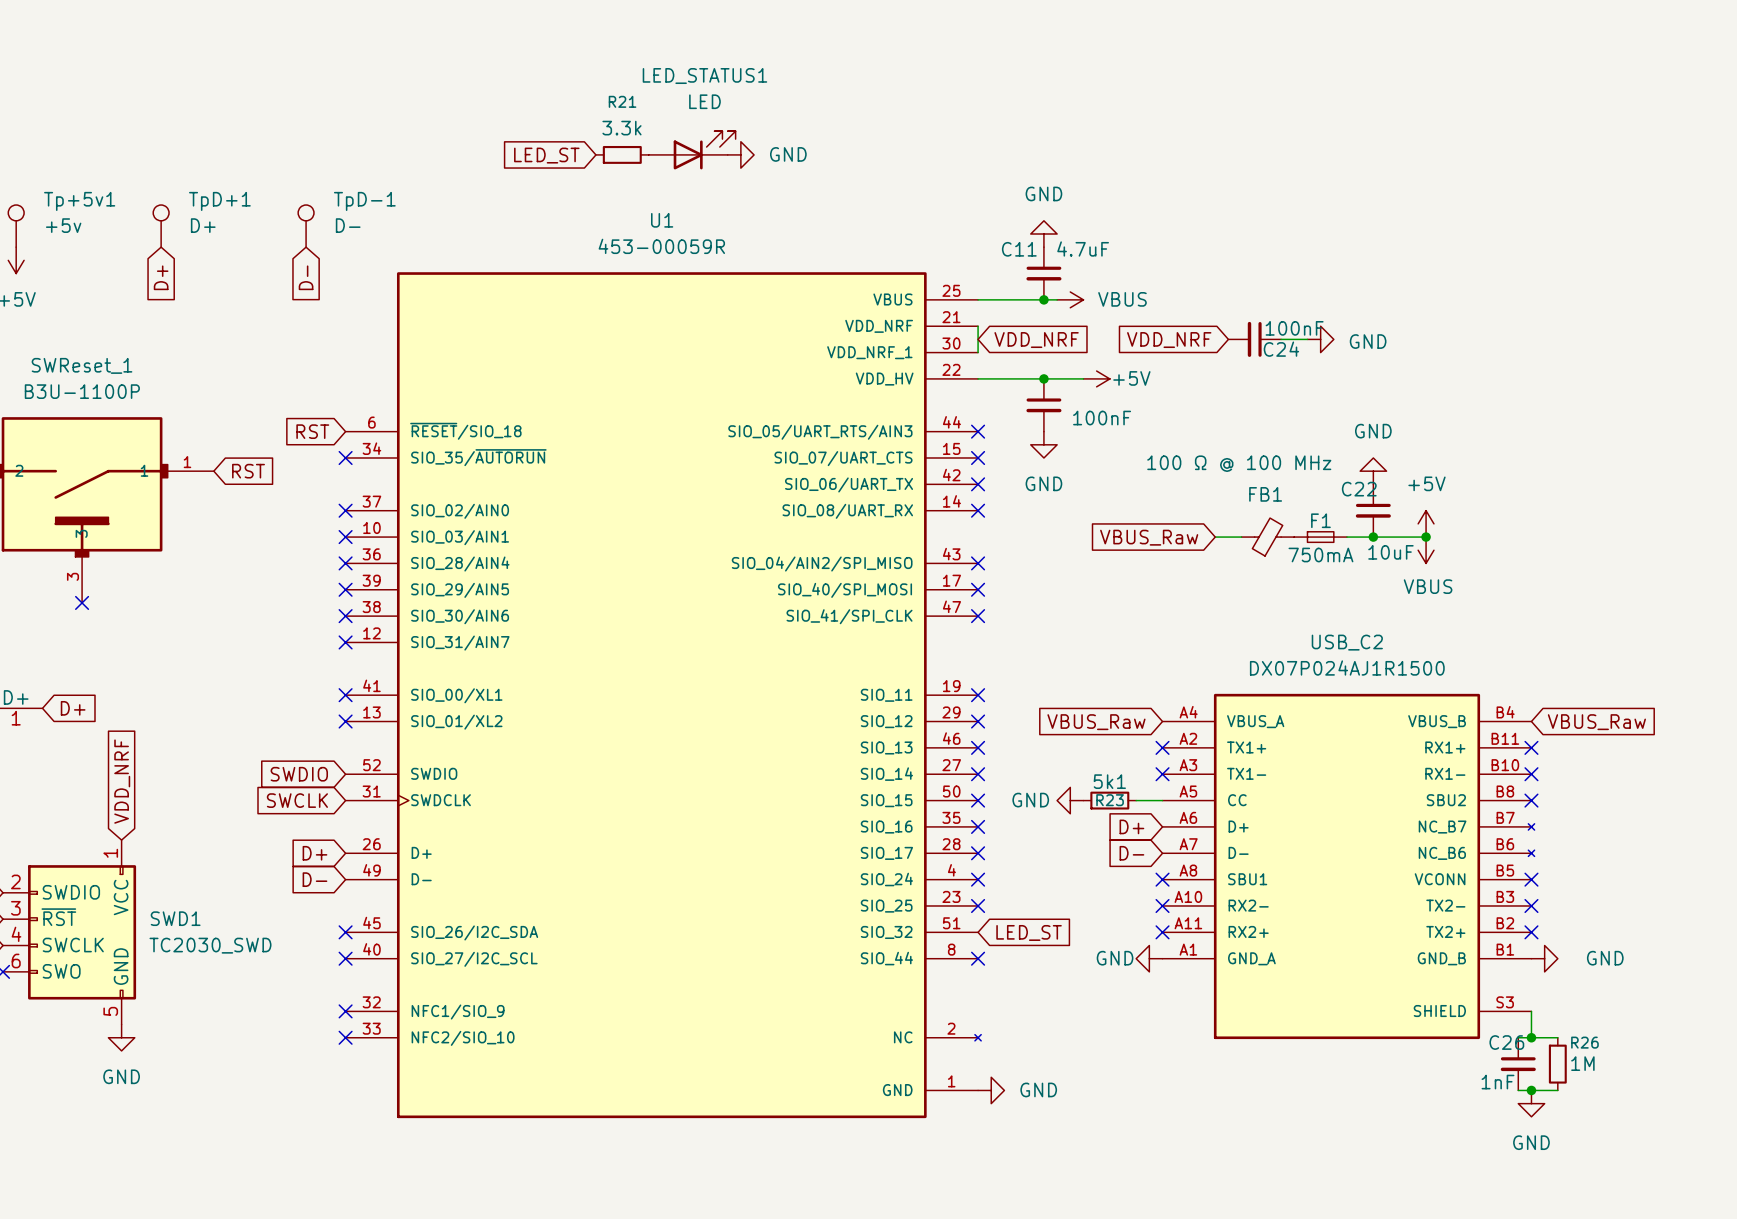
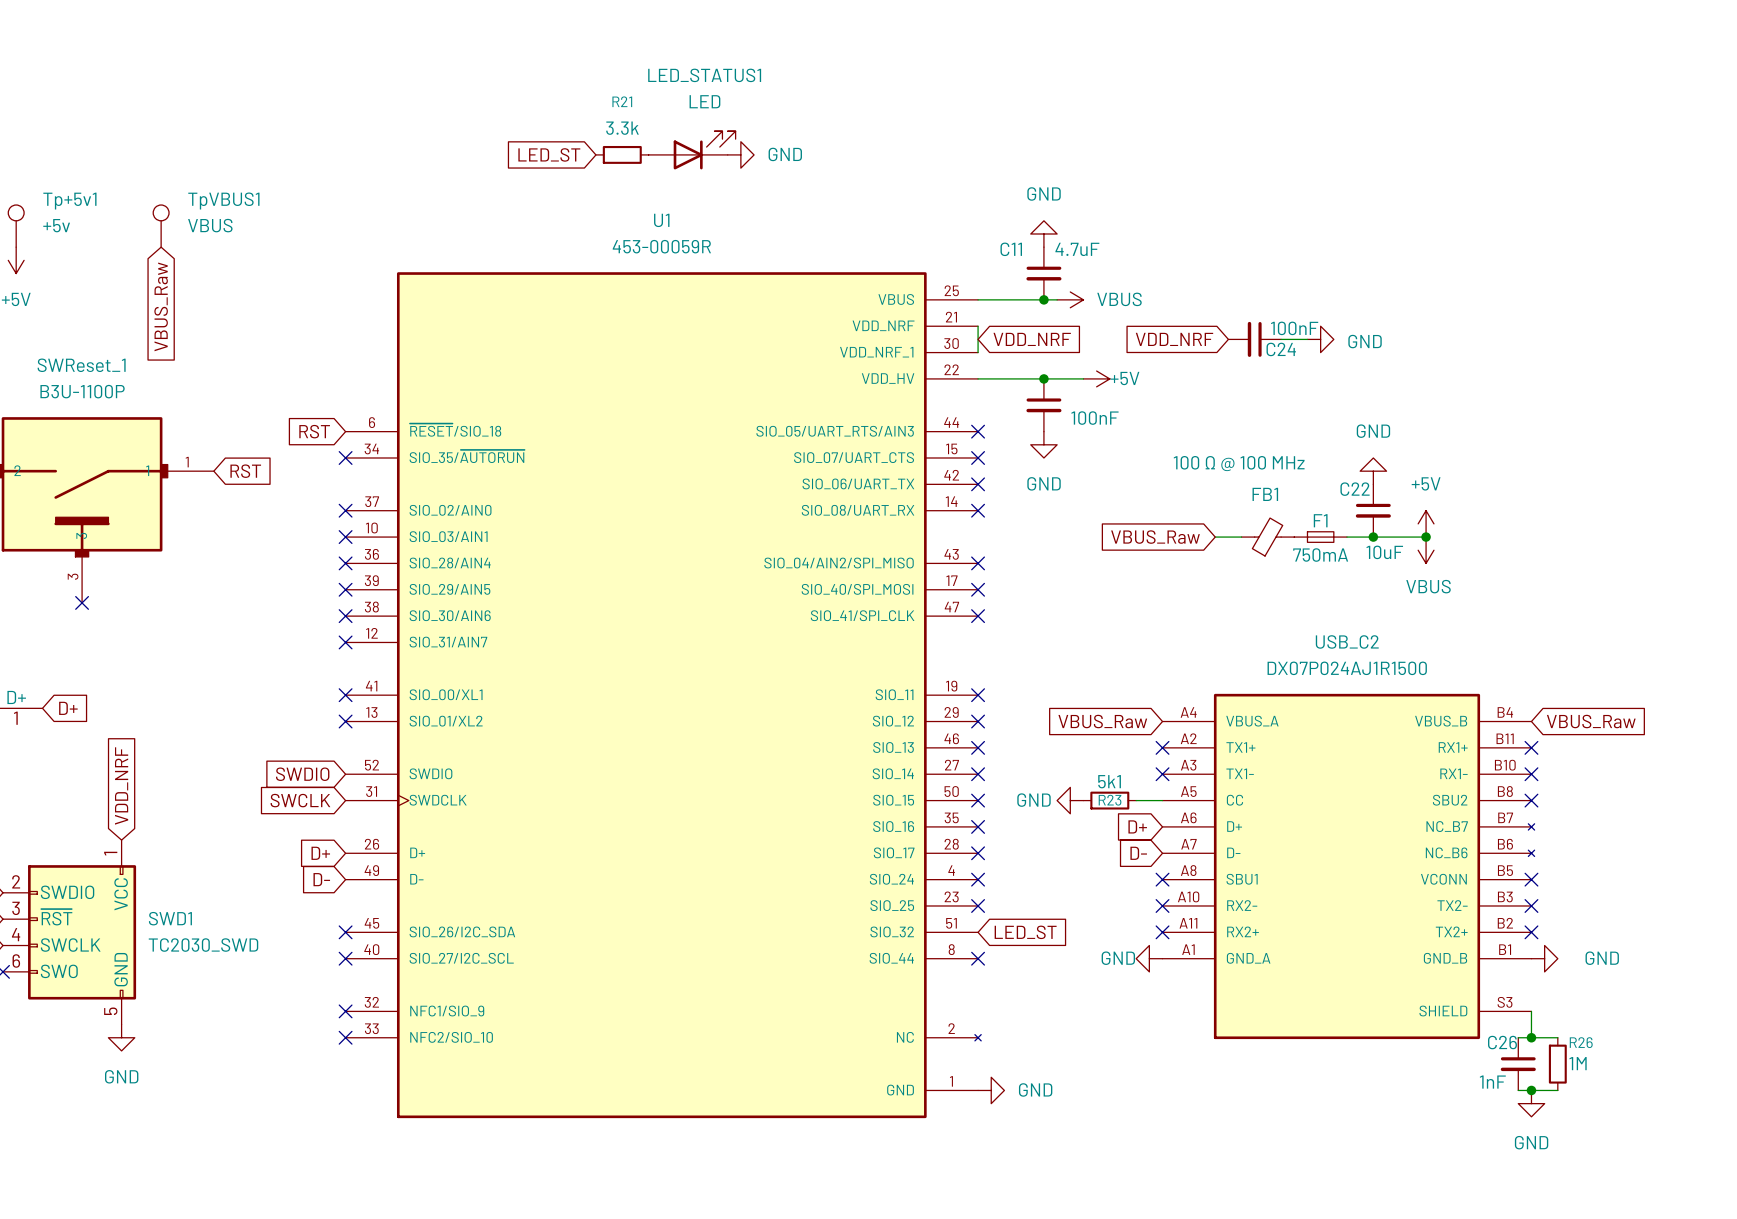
TpD+1 name: TpD+1 (219, 201) -> TpVBUS1 (223, 200)
TpD+1 value: D+ (203, 225) -> VBUS (210, 225)
TpD-1: D- (306, 226) -> none
global label: D+ (161, 277) -> VBUS_Raw (161, 306)
global label: D- (306, 277) -> none

